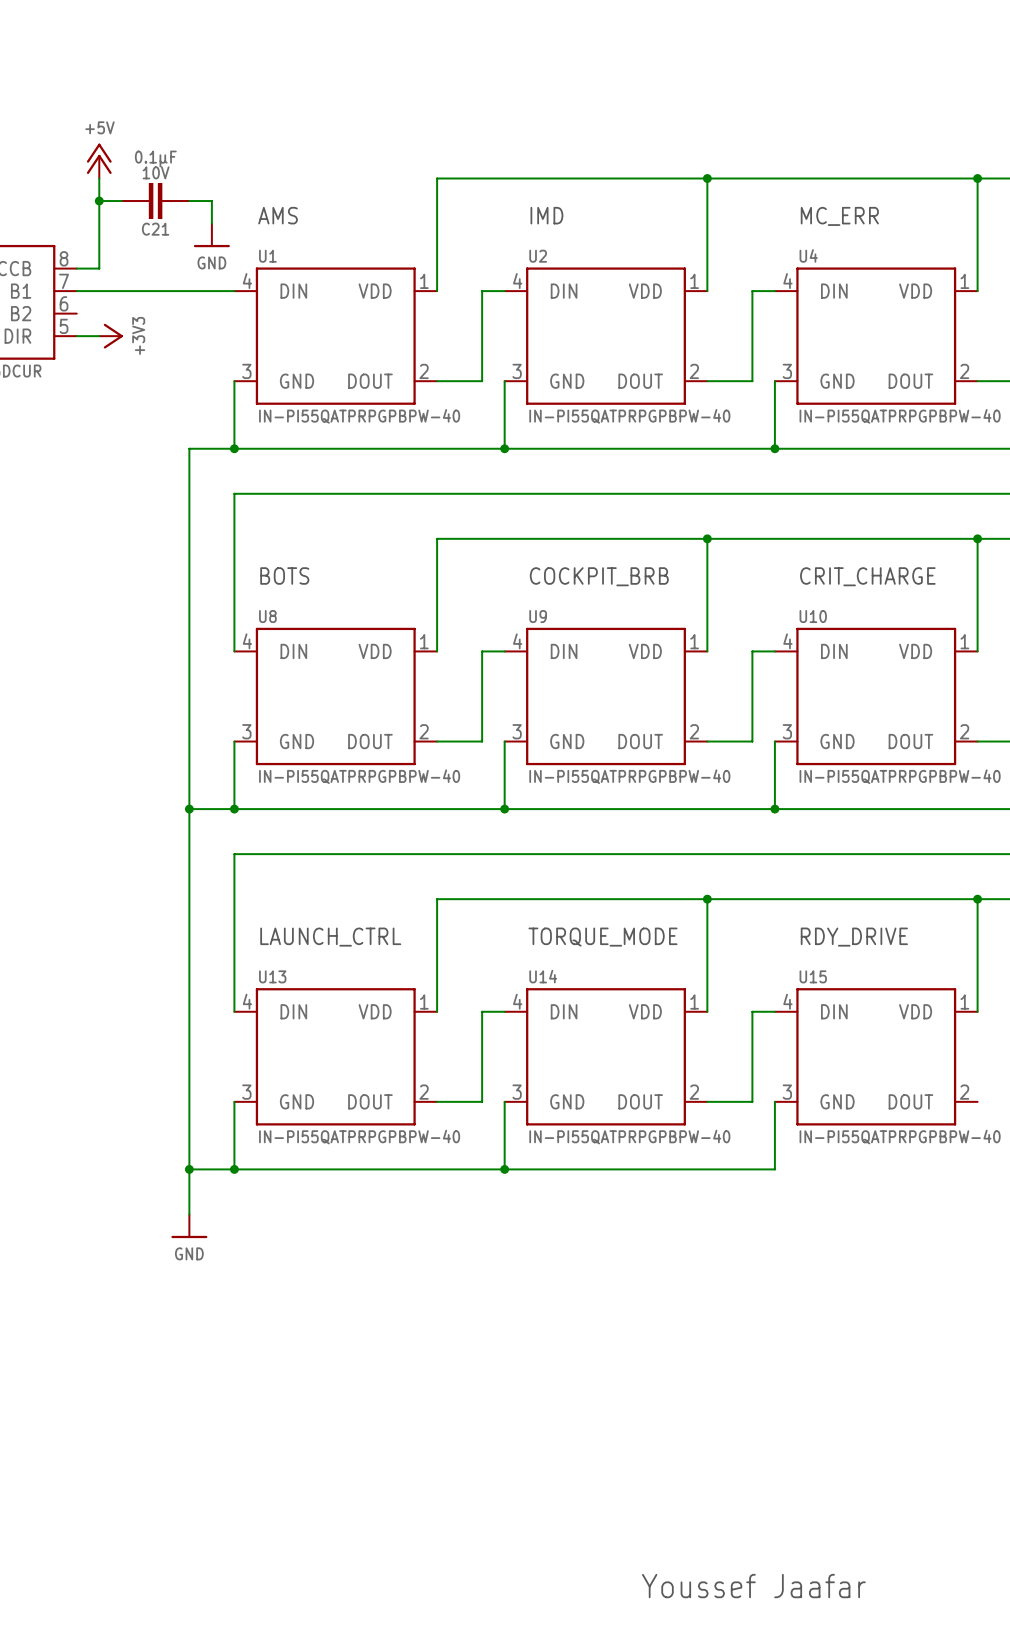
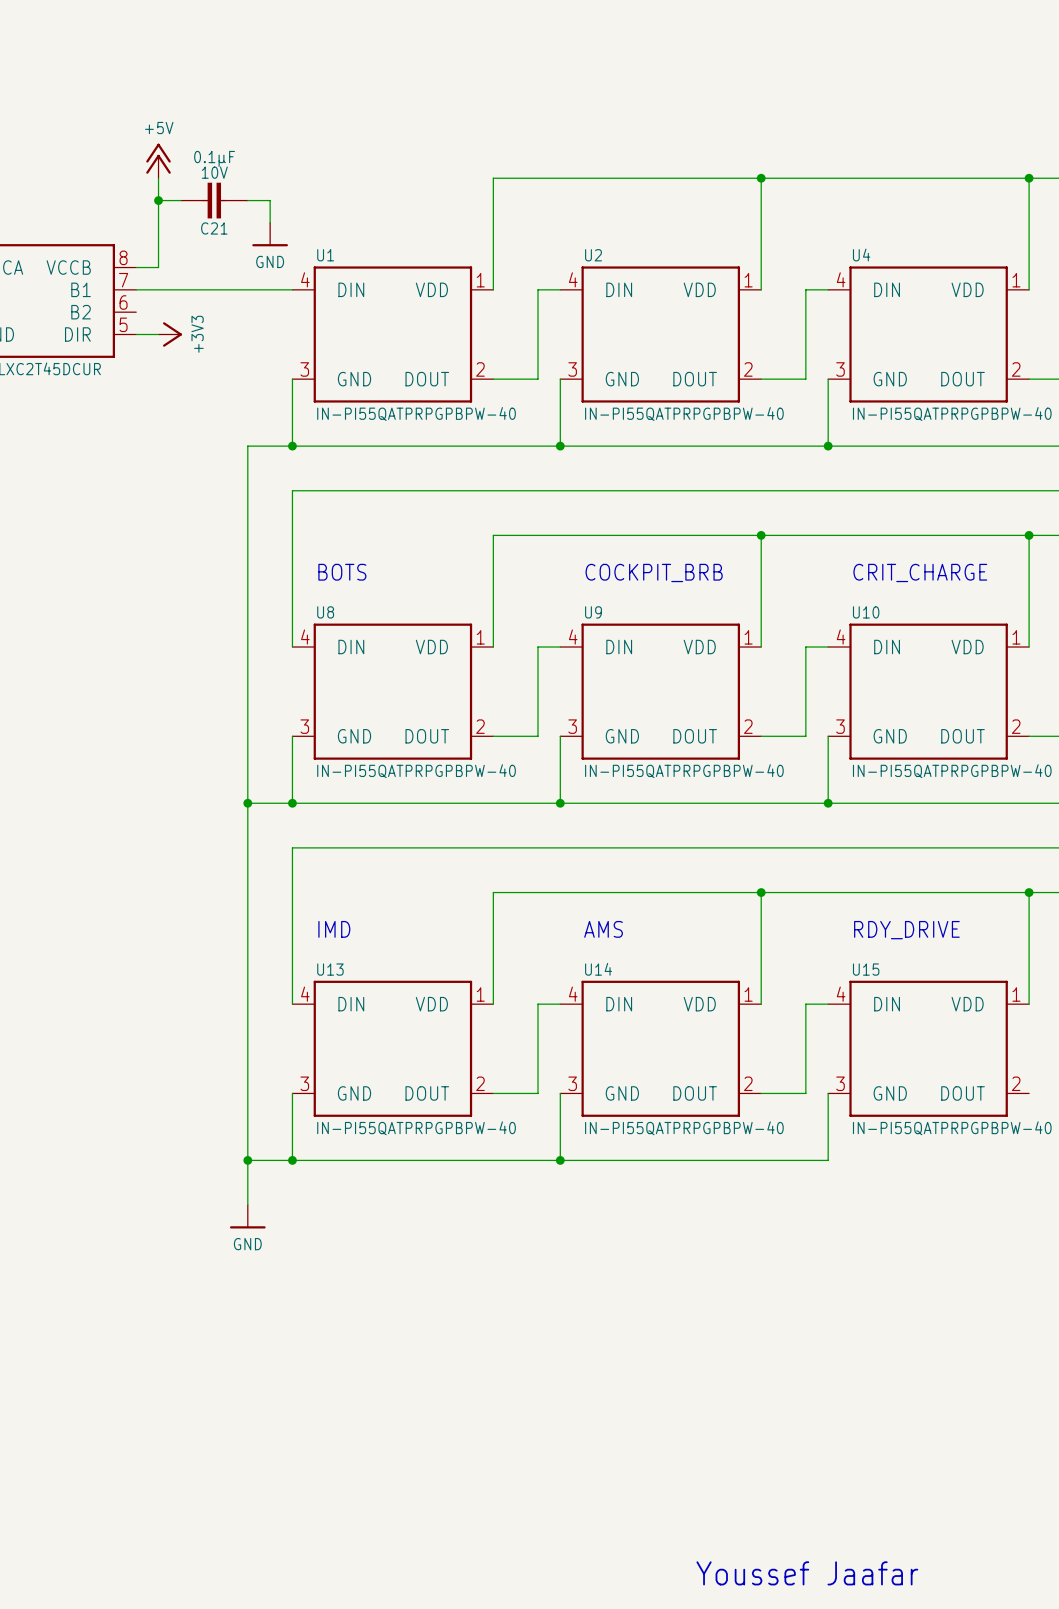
text: AMS (278, 215) -> none
text: IMD (546, 215) -> none
text: MC_ERR (839, 216) -> none
text: LAUNCH_CTRL (330, 937) -> IMD (334, 929)
text: TORQUE_MODE (603, 937) -> AMS (603, 929)

